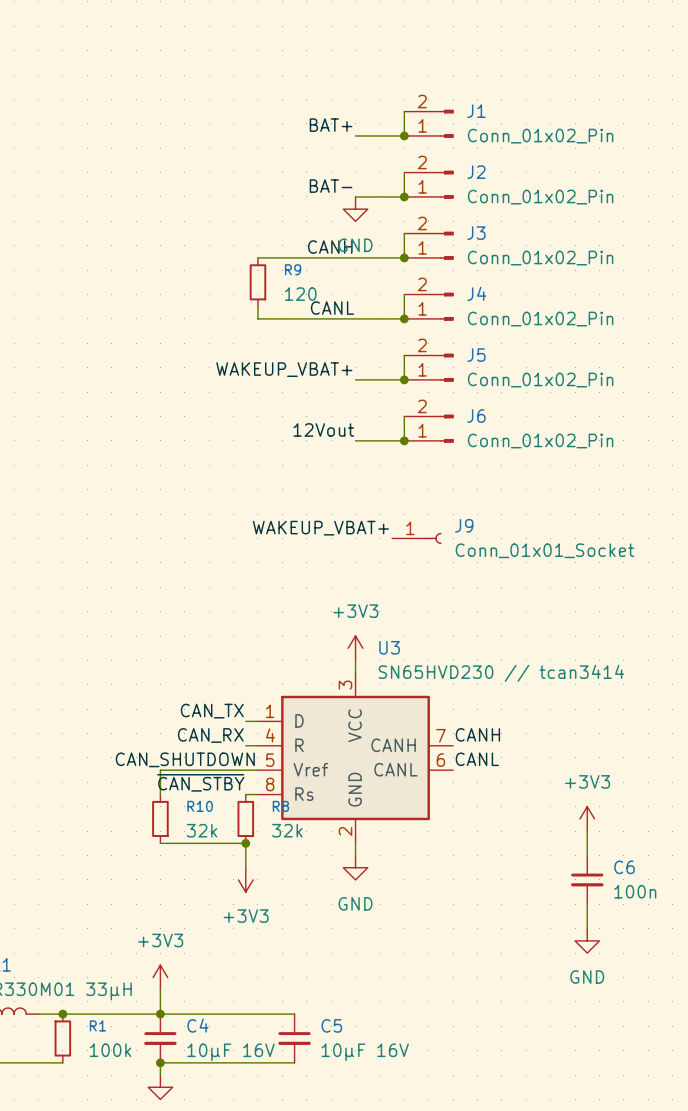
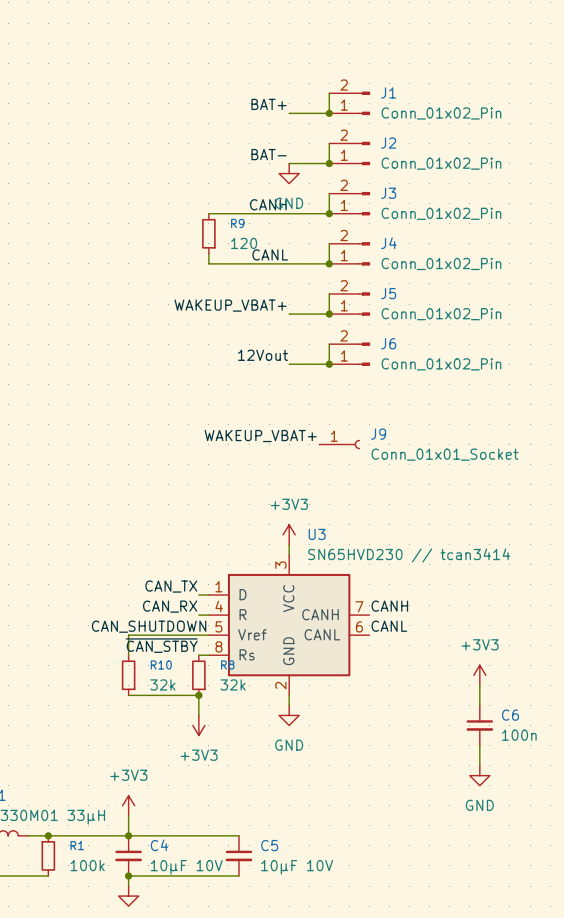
C4 value: 10µF 16V (231, 1052) -> 10µF 10V (186, 867)
C5 value: 10µF 16V (365, 1052) -> 10µF 10V (297, 867)

